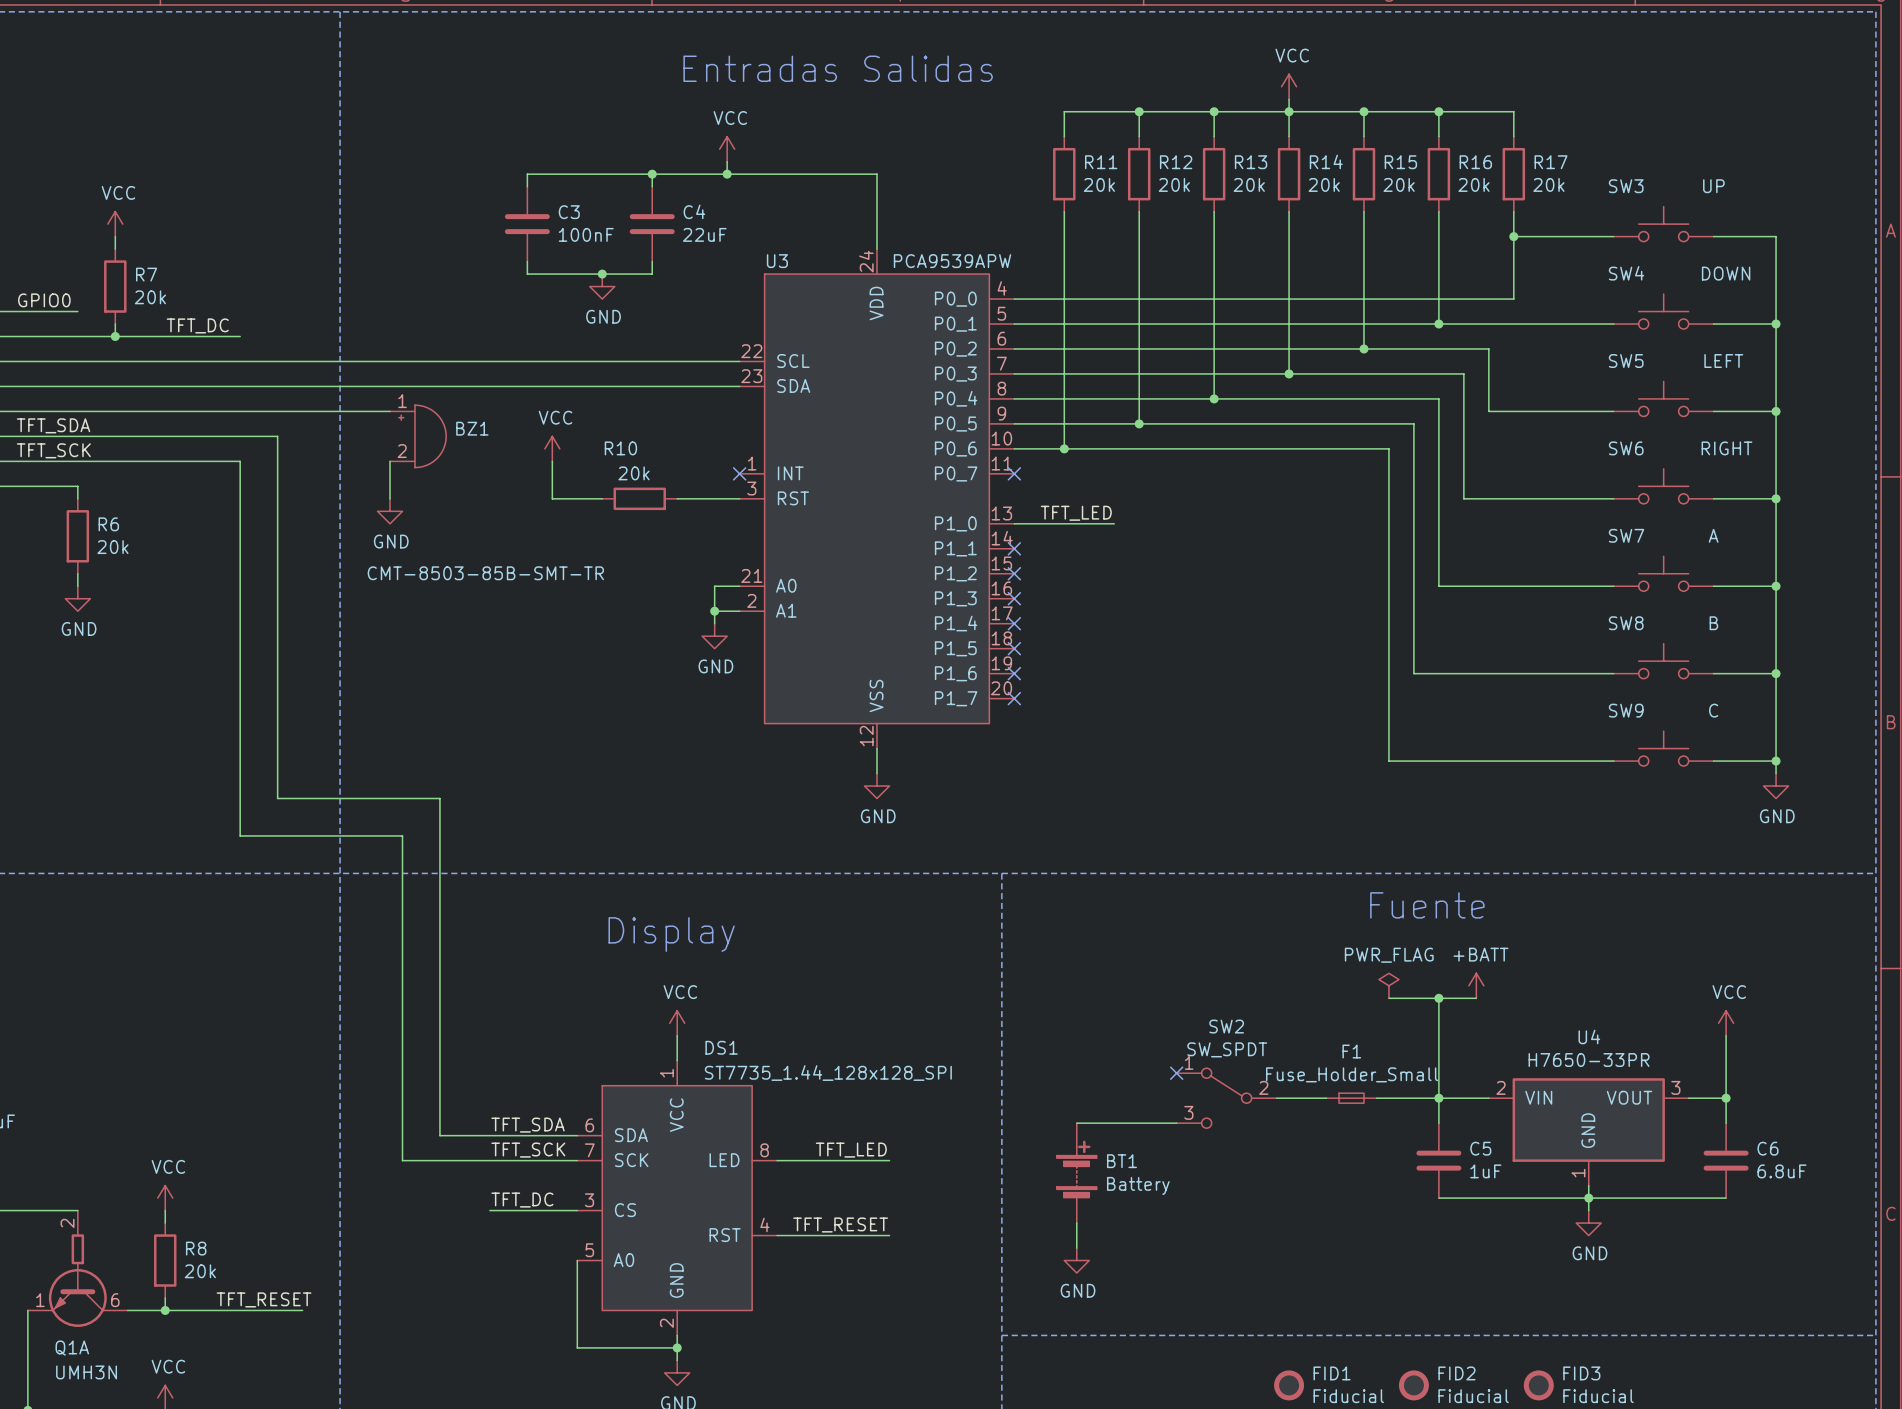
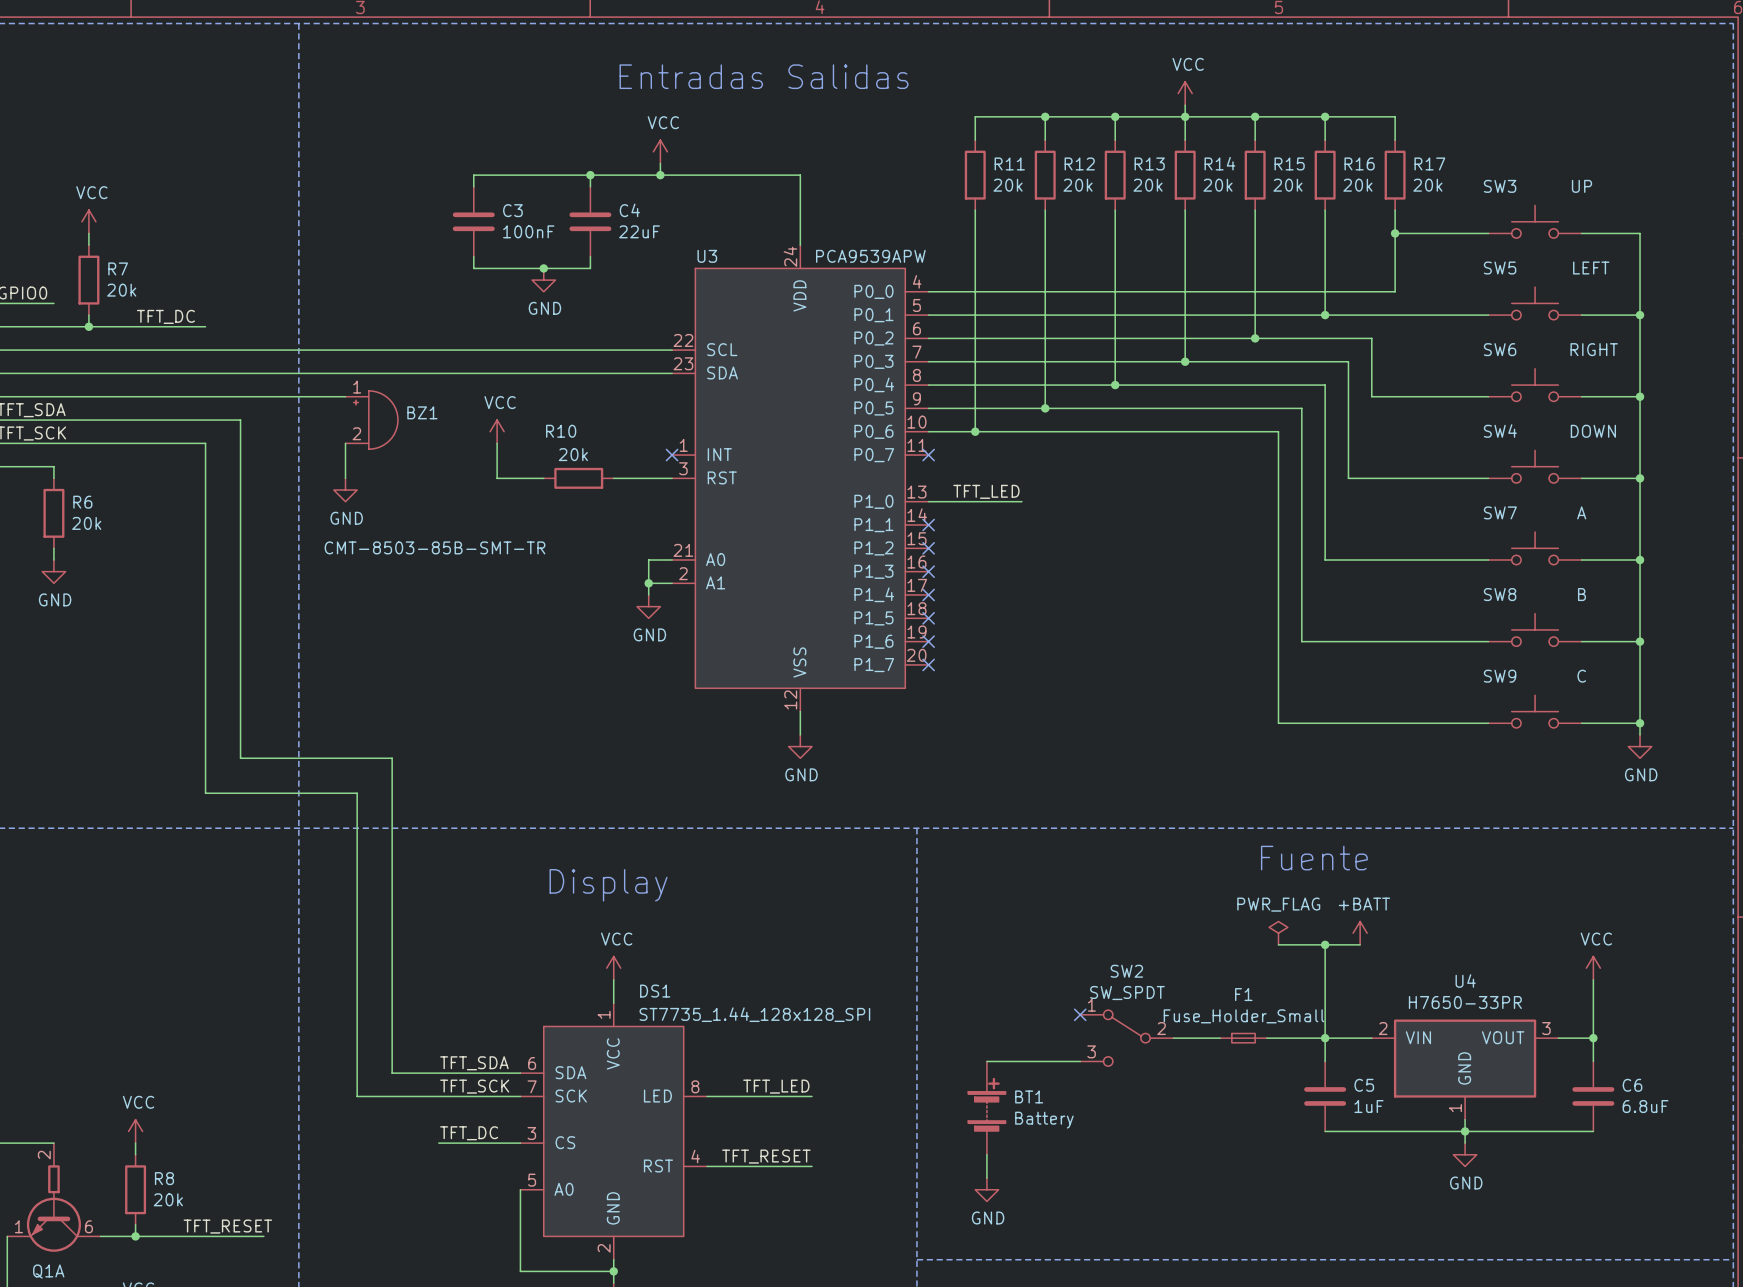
SW4 name: SW4 (1626, 273) -> SW5 (1500, 268)
SW4 value: DOWN (1726, 273) -> LEFT (1591, 268)
SW5 name: SW5 (1626, 361) -> SW6 (1500, 349)
SW5 value: LEFT (1723, 361) -> RIGHT (1594, 349)
SW6 name: SW6 (1626, 448) -> SW4 (1500, 431)
SW6 value: RIGHT (1726, 448) -> DOWN (1593, 431)

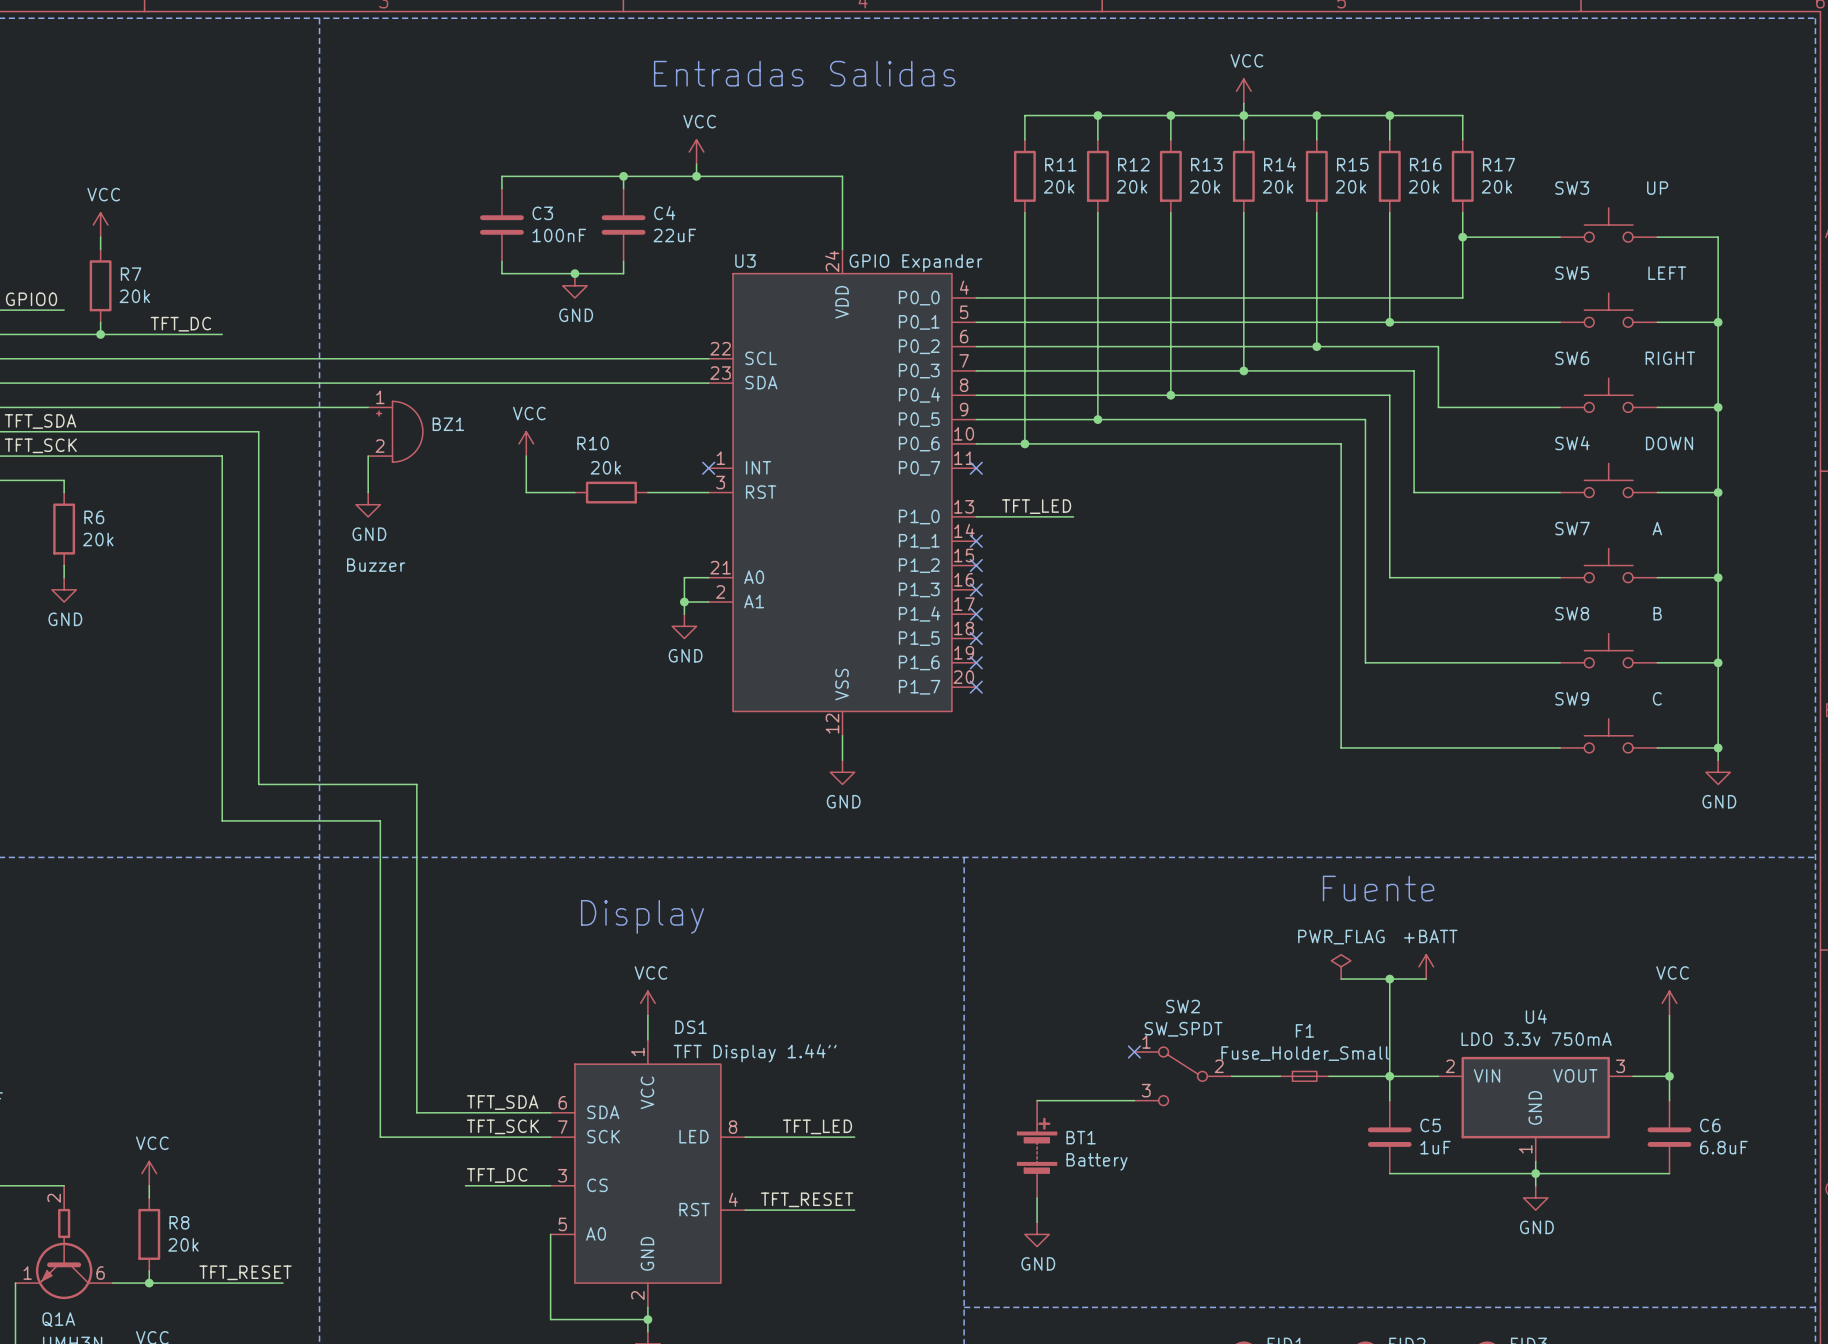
U3 value: PCA9539APW (870, 256) -> GPIO Expander (916, 263)
BZ1 value: CMT-8503-85B-SMT-TR (435, 547) -> Buzzer (376, 565)
U4 value: H7650-33PR (1465, 1002) -> LDO 3.3v 750mA (1536, 1039)
DS1 value: ST7735_1.44_128x128_SPI (754, 1014) -> TFT Display 1.44'' (755, 1053)

